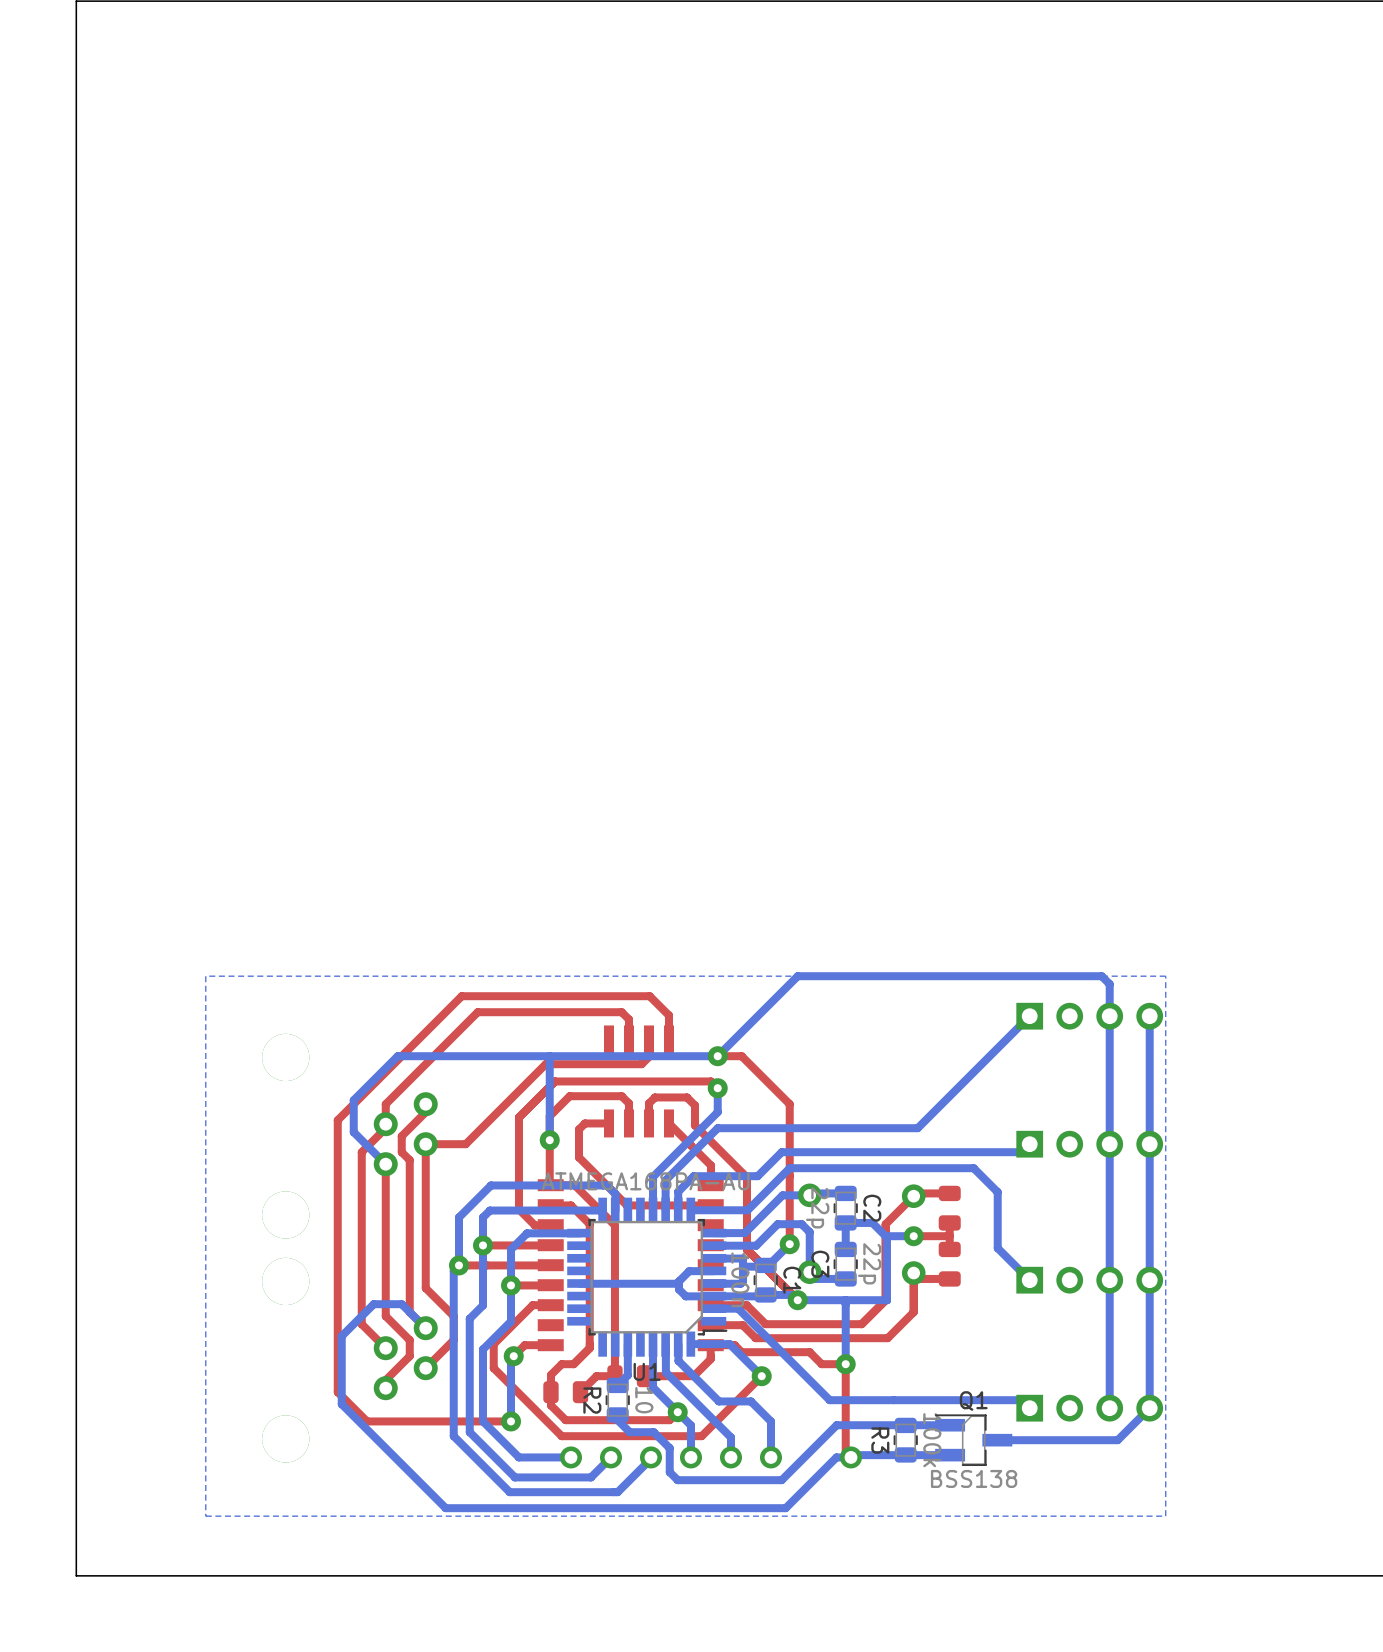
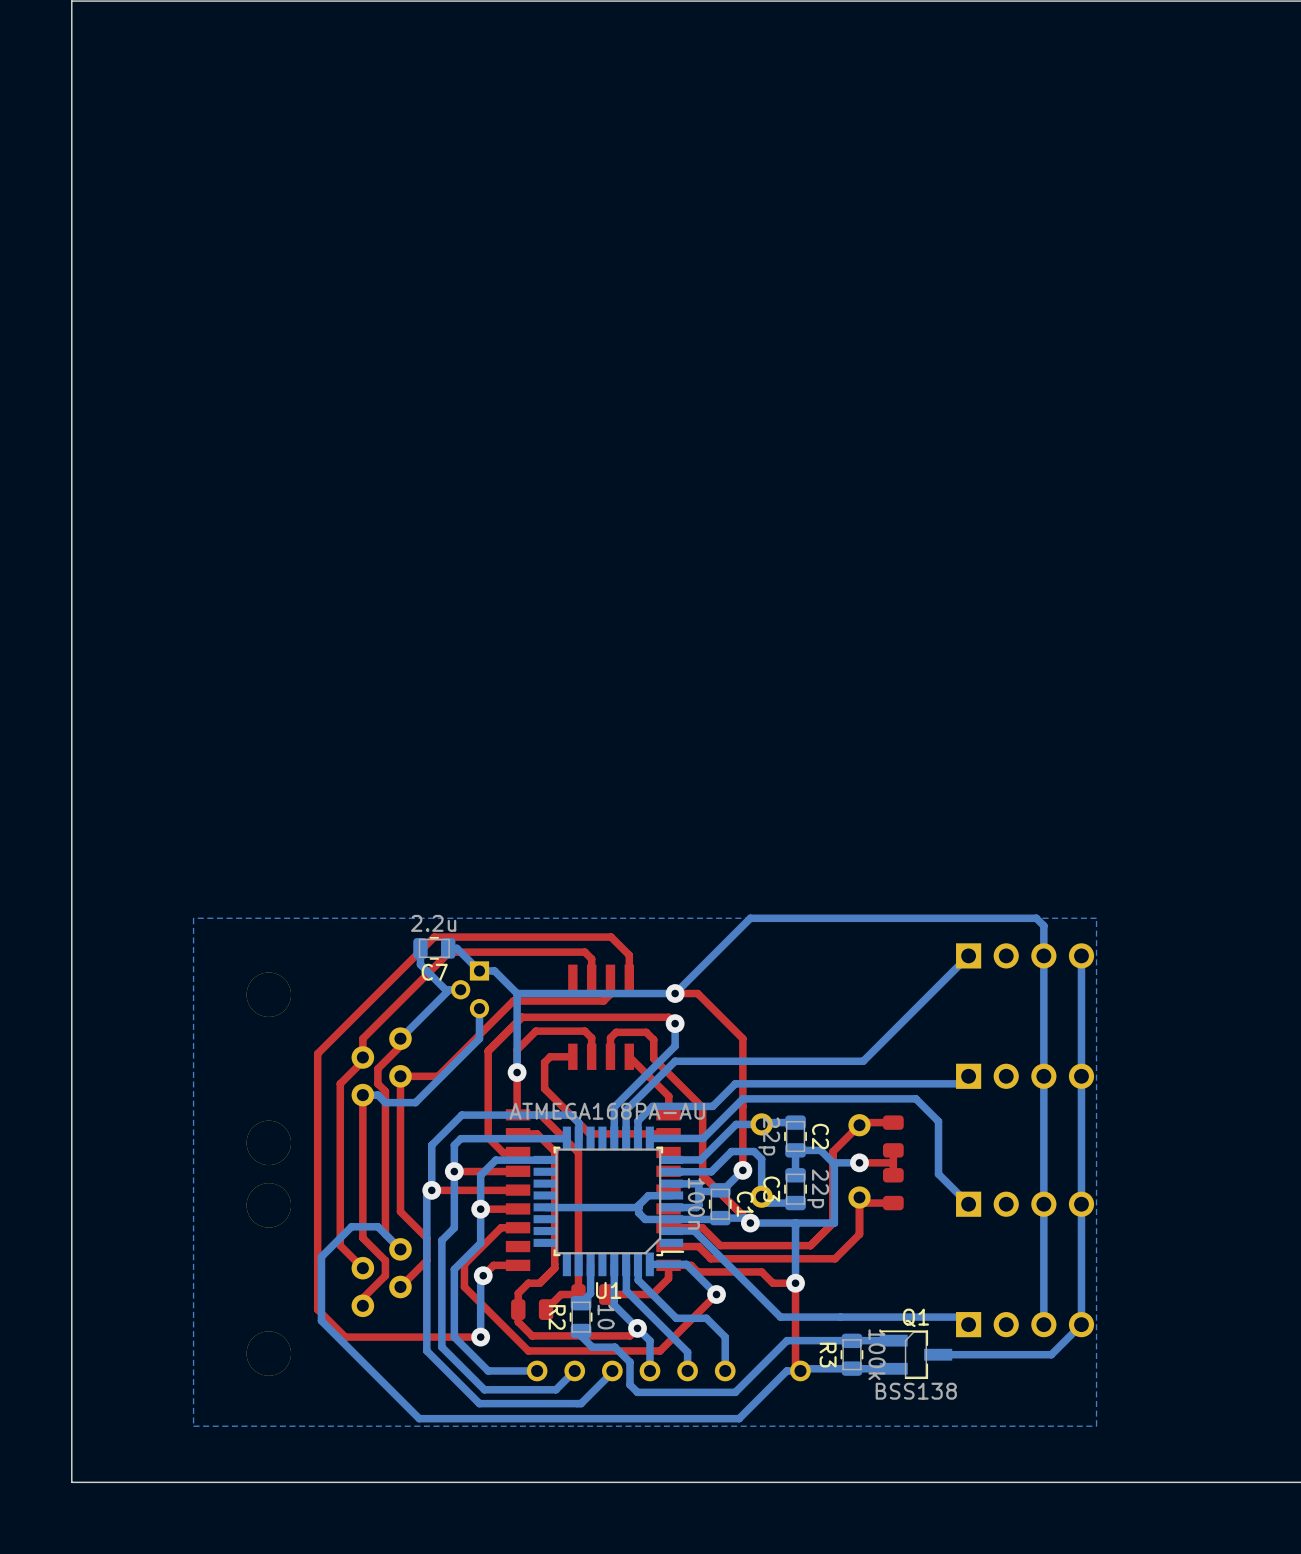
bottom track: none -> (420, 948) (420, 964) (445, 989) (460, 989)
C7: none -> 2.2u (434, 948)
bottom track: none -> (448, 948) (456, 948) (479, 970) (494, 970) (517, 993)
bottom track: none -> (449, 989) (400, 1038)
part: none -> (470, 989)
bottom track: (549, 1056) (397, 1056) (353, 1100) (353, 1132) (385, 1164) -> (479, 1008) (479, 1038) (415, 1102) (385, 1102) (377, 1095) (362, 1095)

